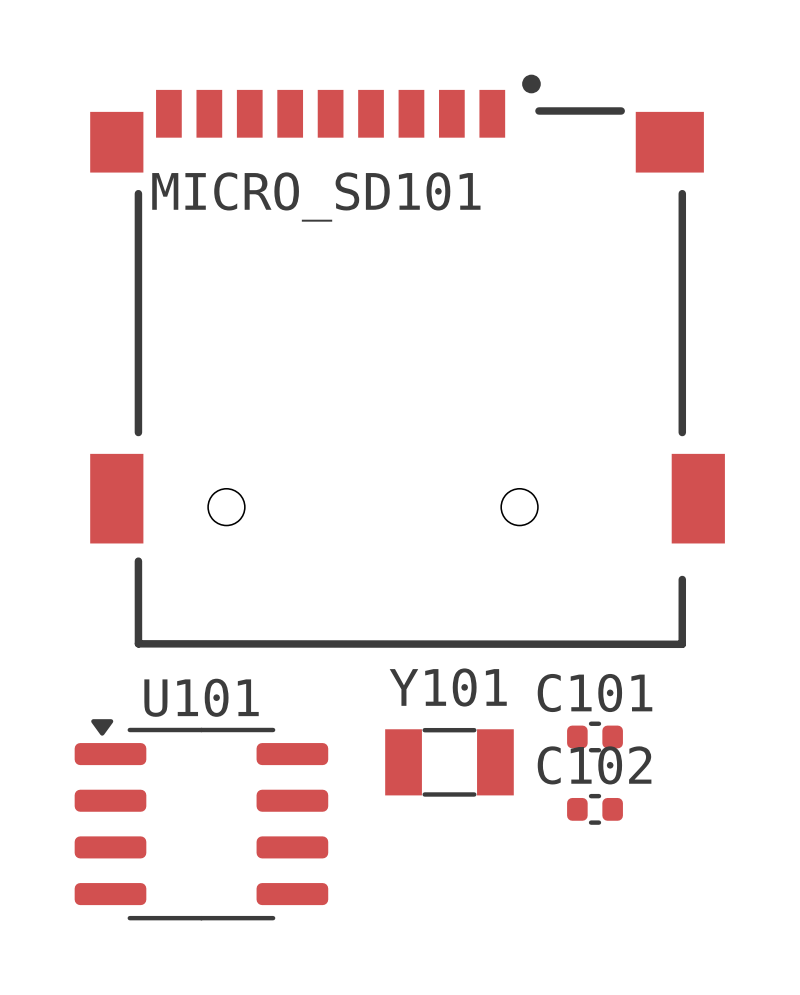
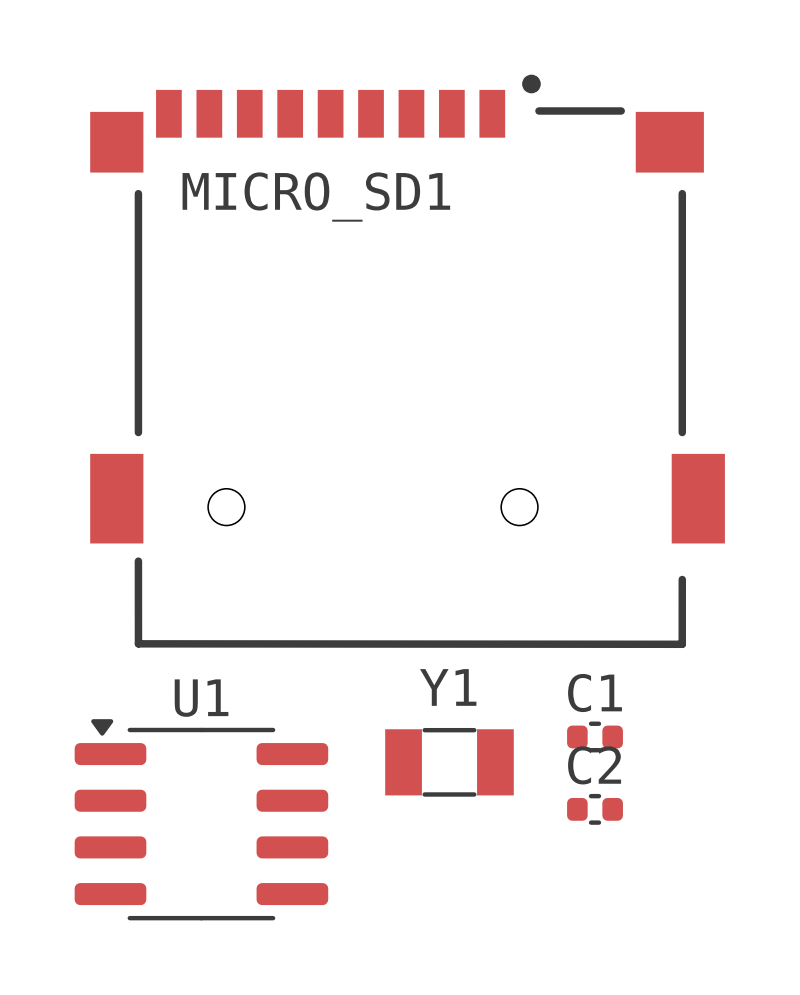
MICRO_SD101 name: MICRO_SD101 (316, 197) -> MICRO_SD1 (316, 197)
Y101 name: Y101 (448, 687) -> Y1 (448, 687)
C101 name: C101 (595, 693) -> C1 (595, 693)
U101 name: U101 (201, 697) -> U1 (201, 698)
C102 name: C102 (594, 765) -> C2 (594, 765)

